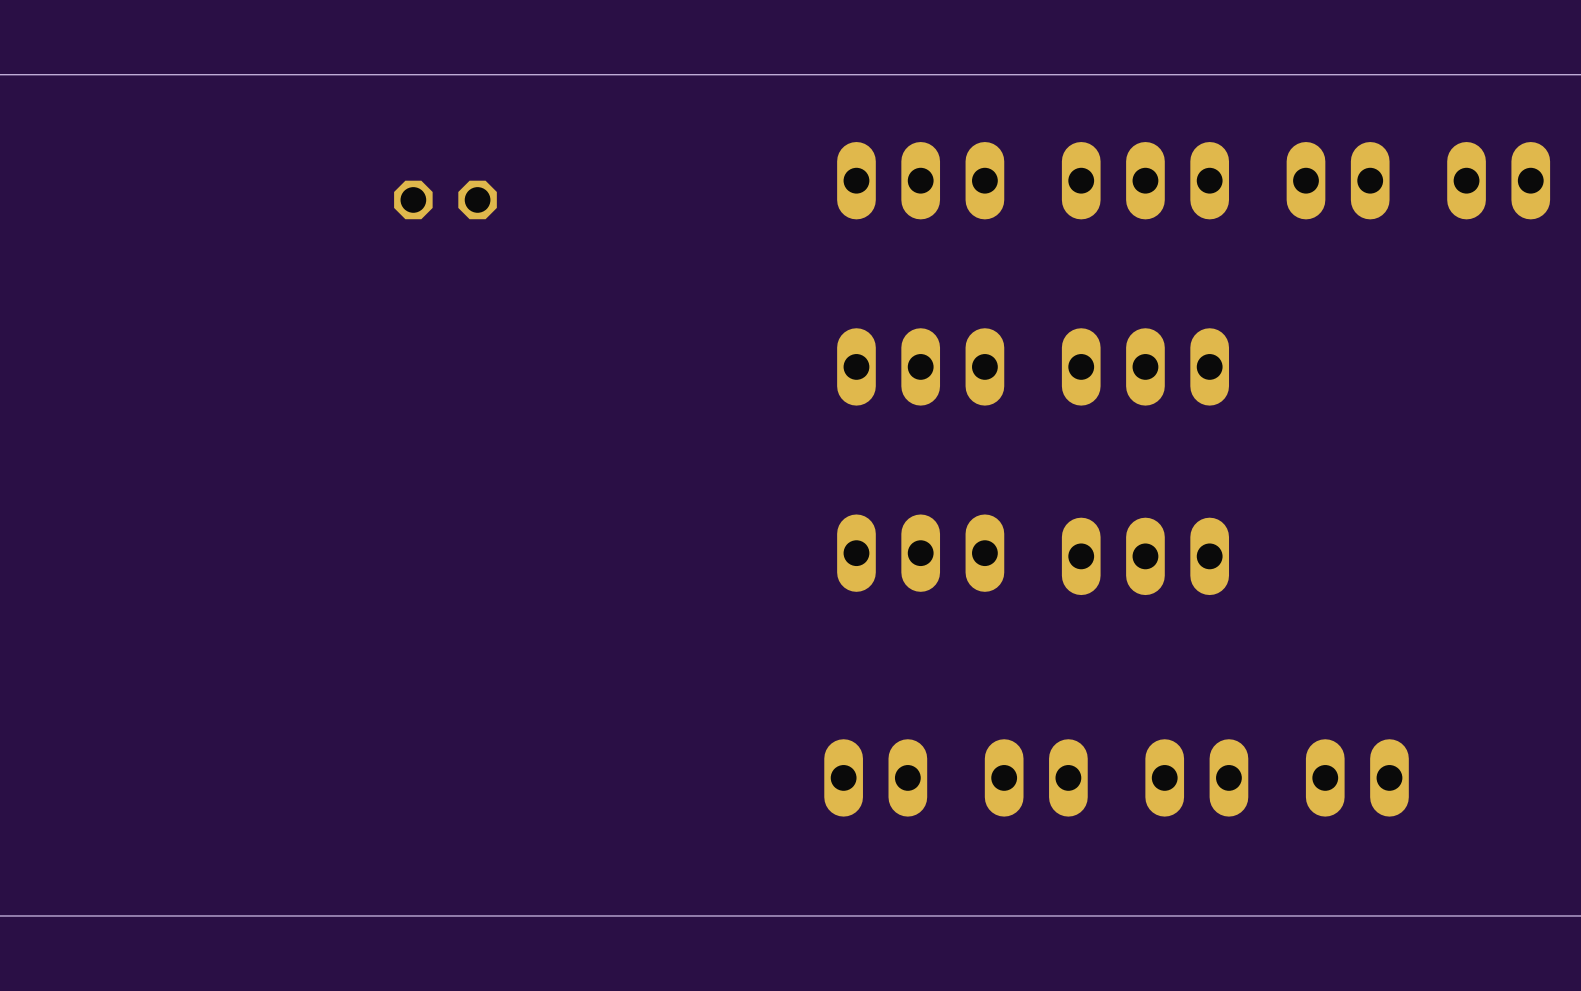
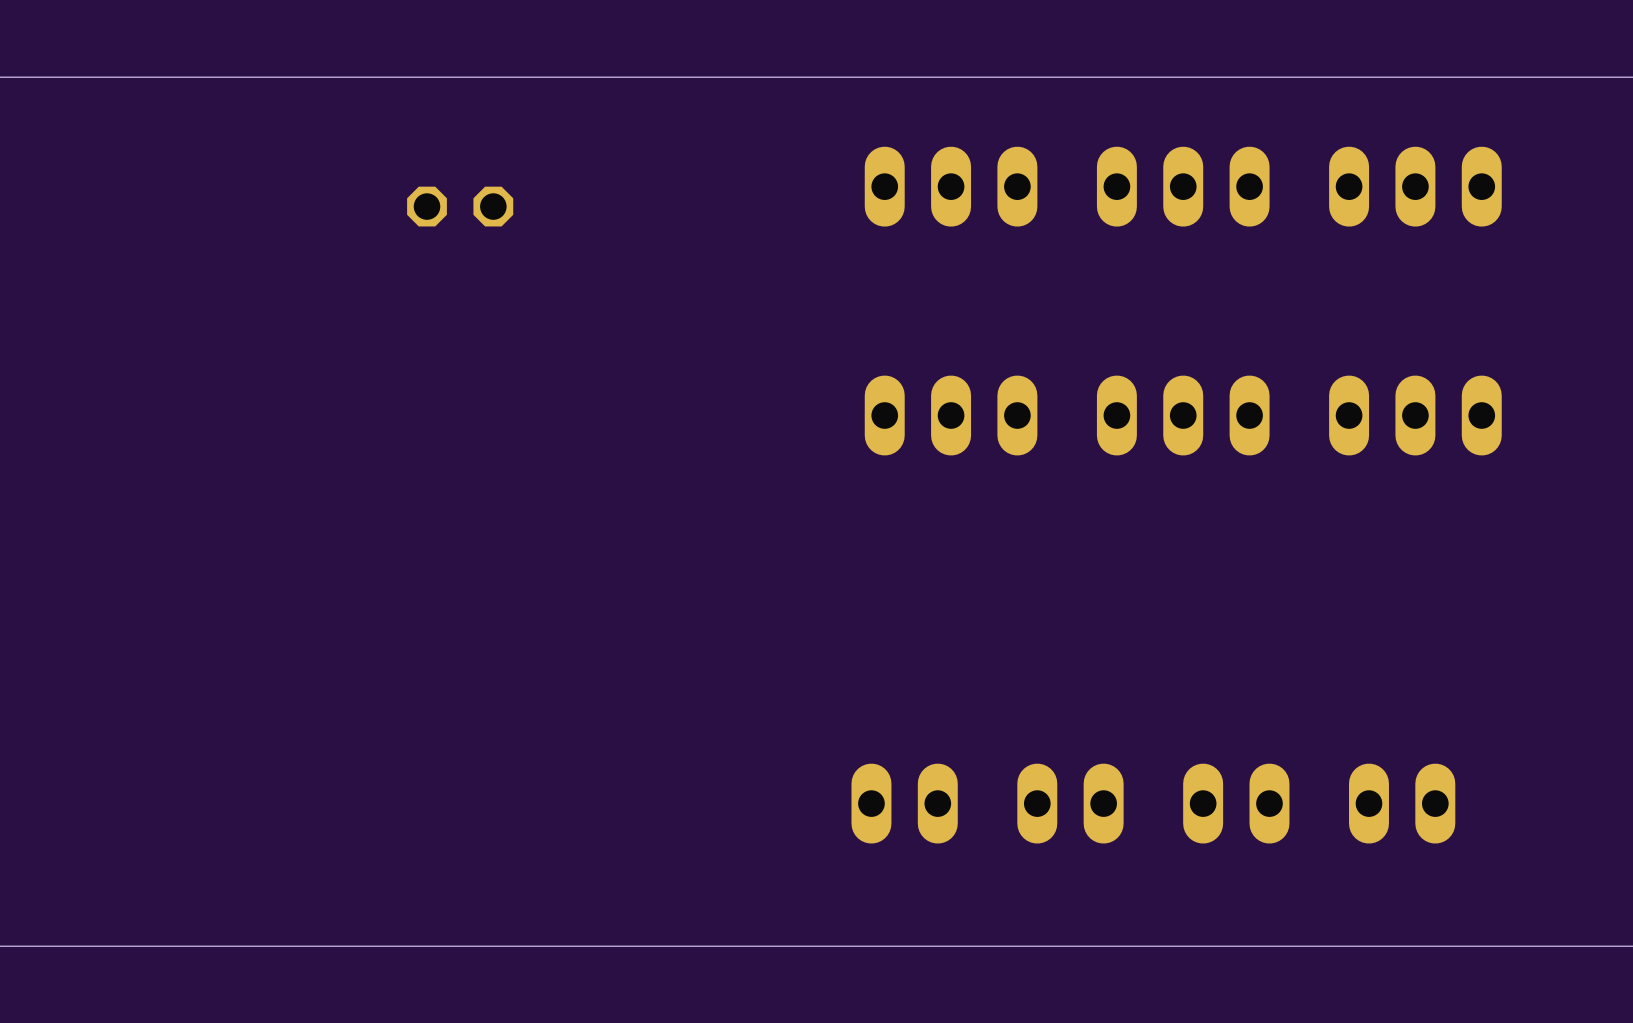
part: none -> (1415, 186)
part: (1498, 180) -> none
part position: (920, 366) -> (951, 415)
part position: (1145, 366) -> (1183, 415)
part: none -> (1415, 415)
part: (920, 553) -> none
part: (1145, 556) -> none

